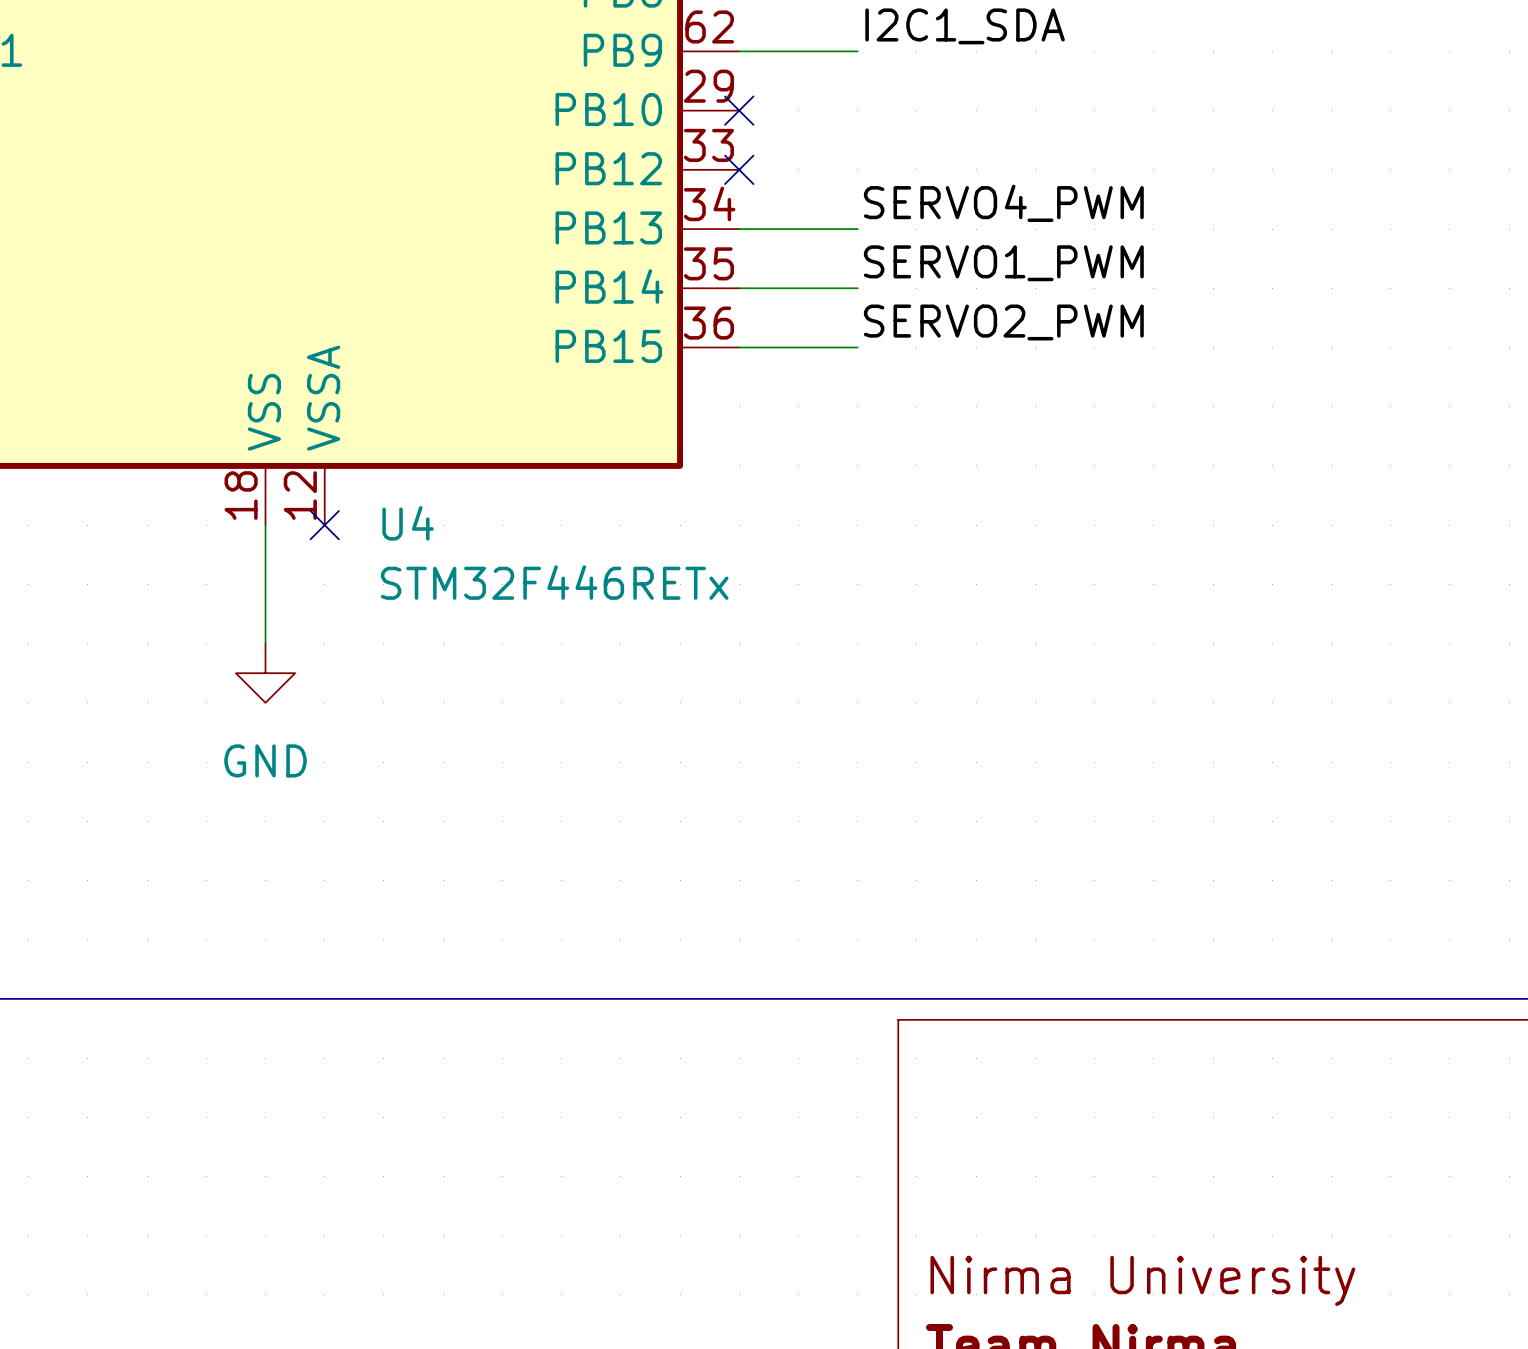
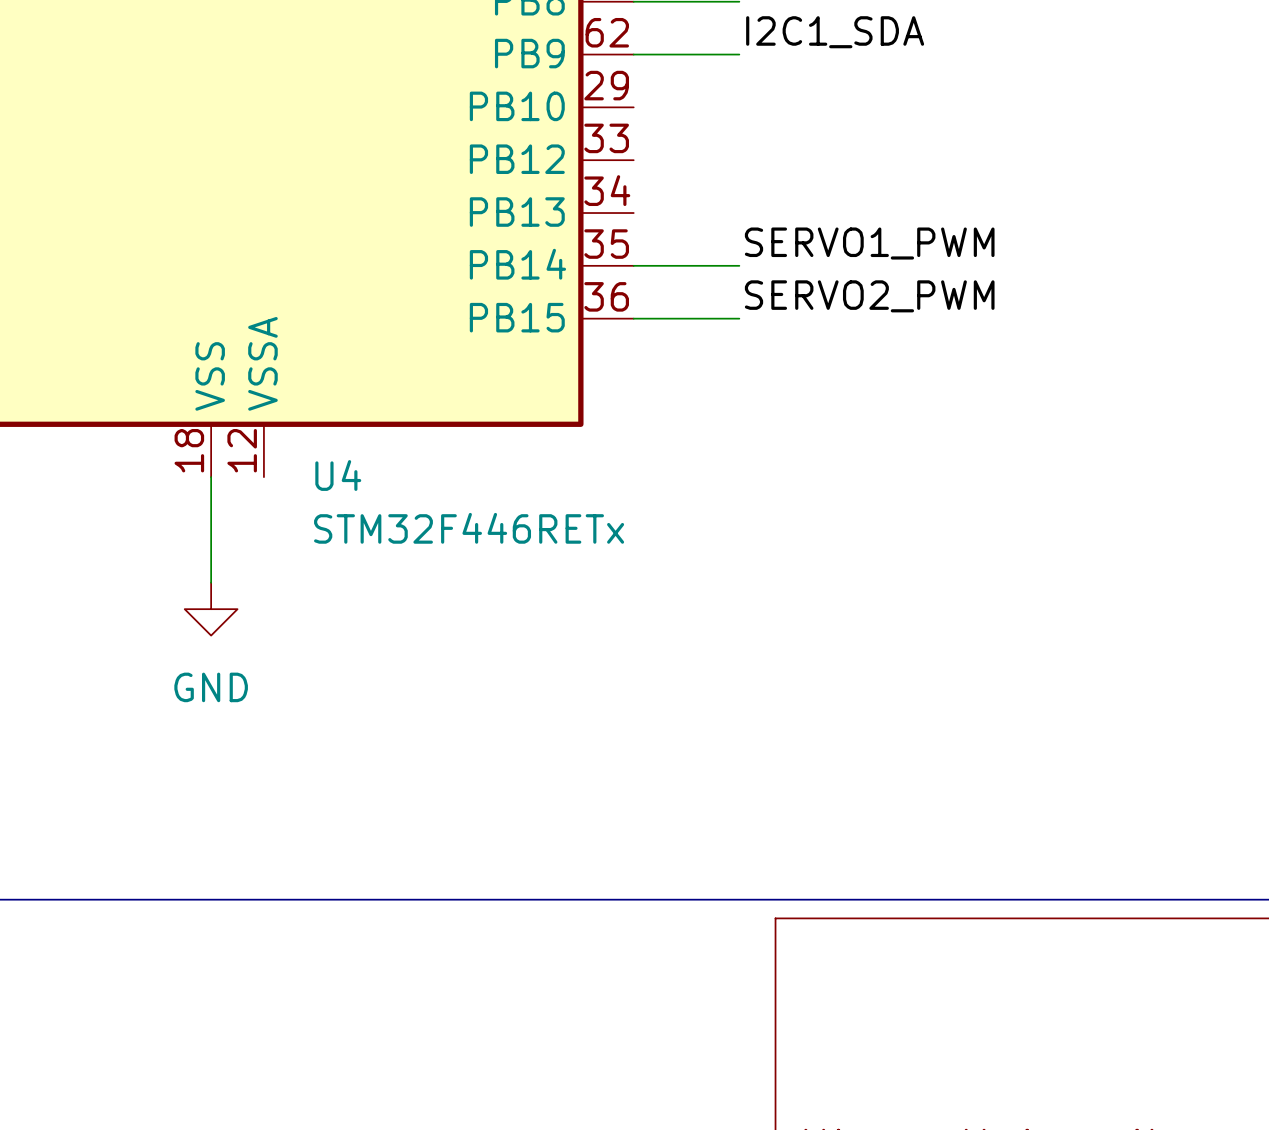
no-connect mark: (739, 110) -> none
no-connect mark: (739, 169) -> none
label: SERVO4_PWM (1003, 203) -> none
wire: (739, 229) (857, 229) -> none
no-connect mark: (324, 525) -> none

